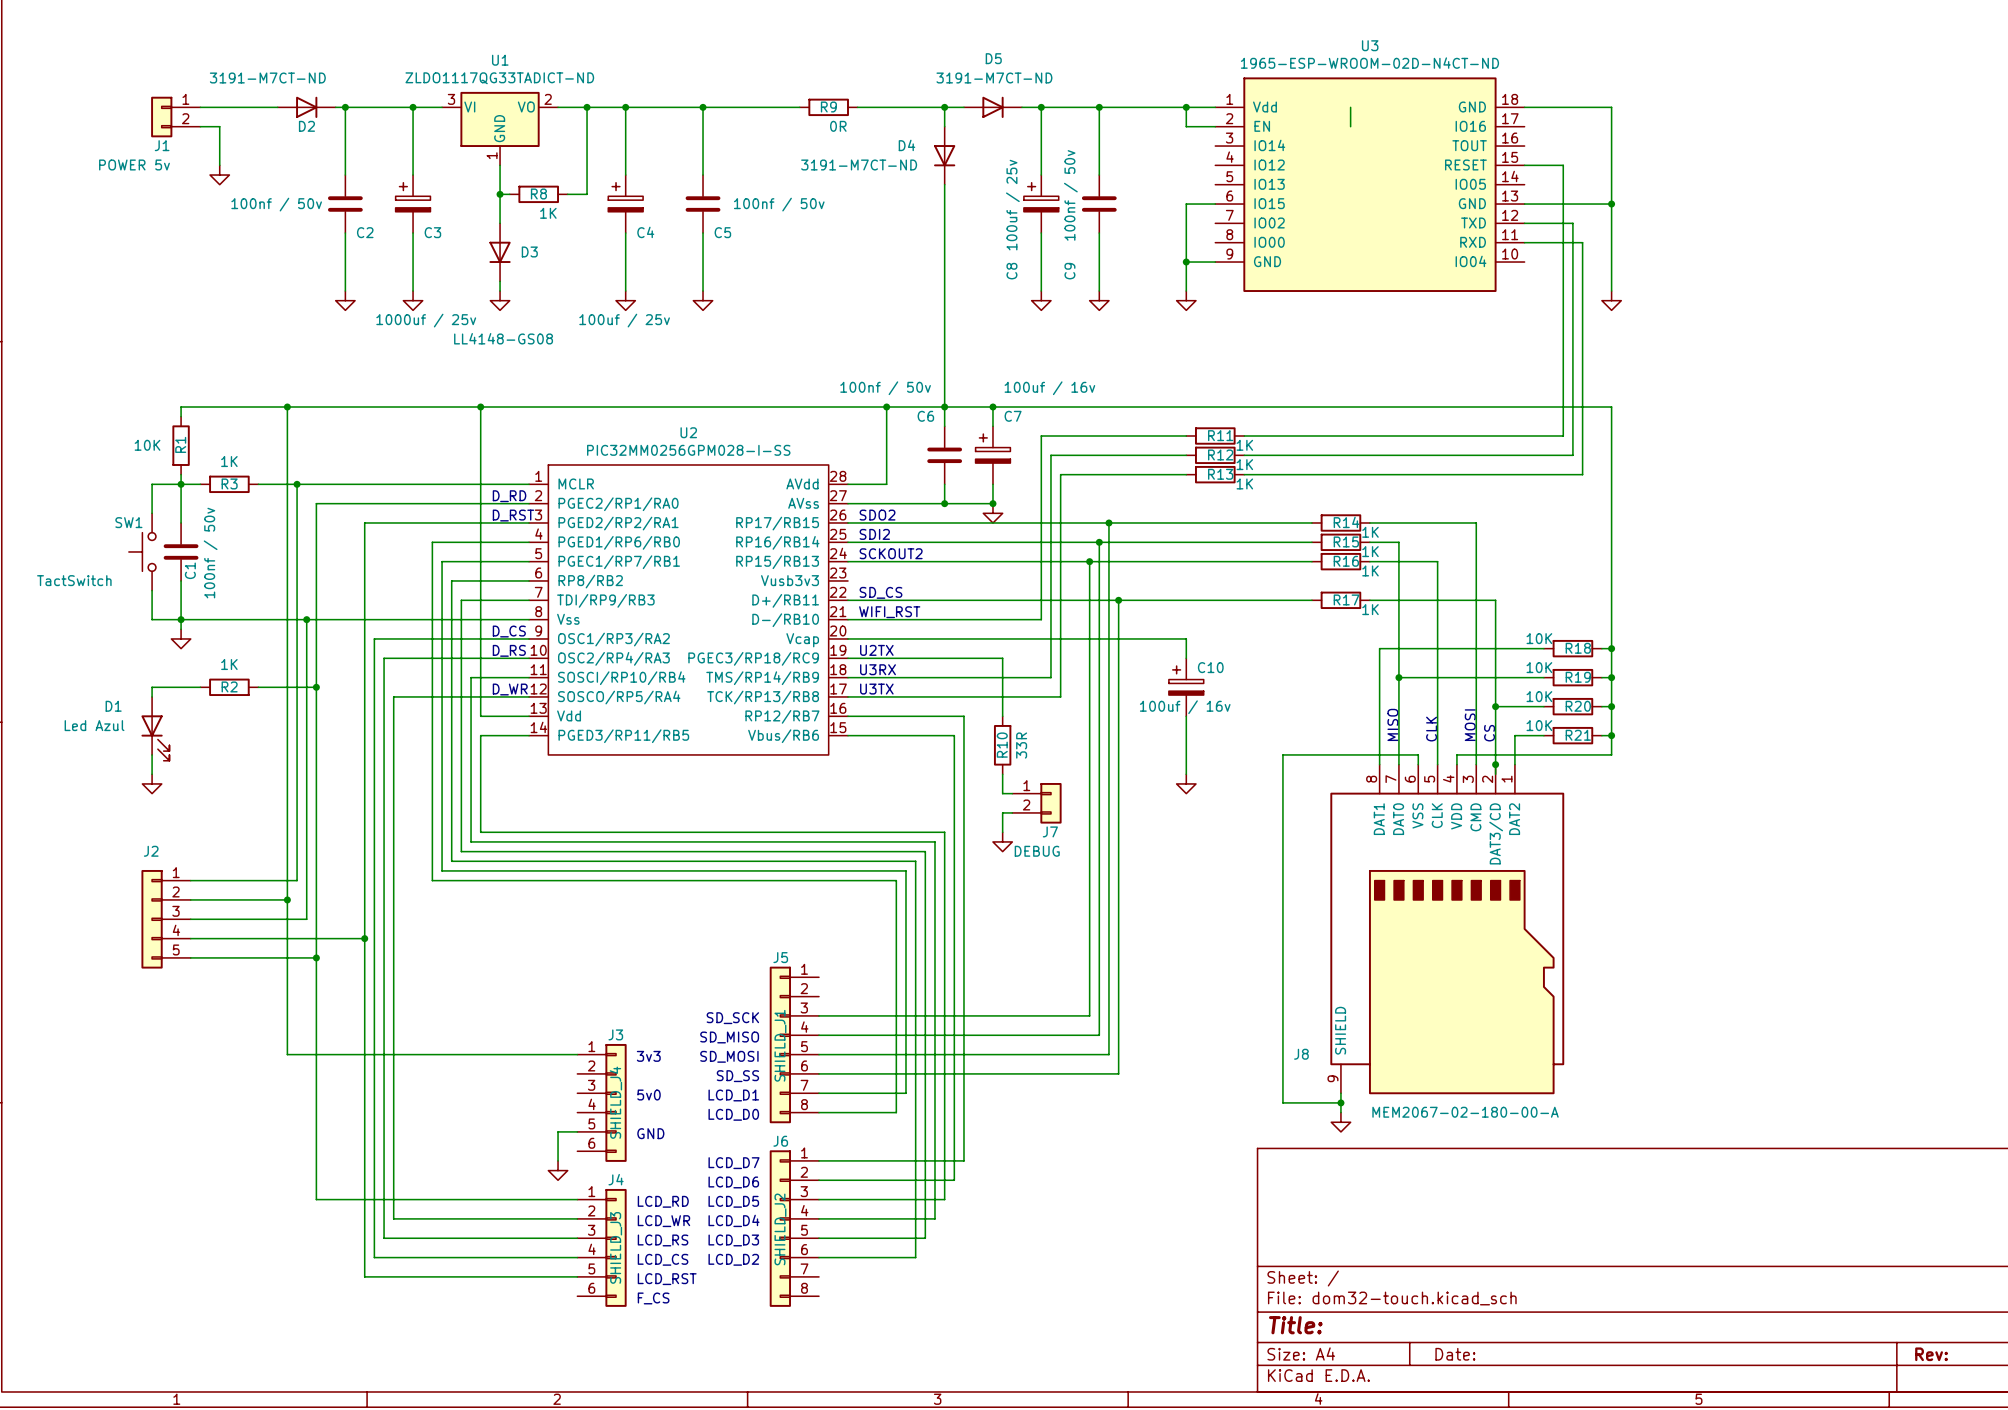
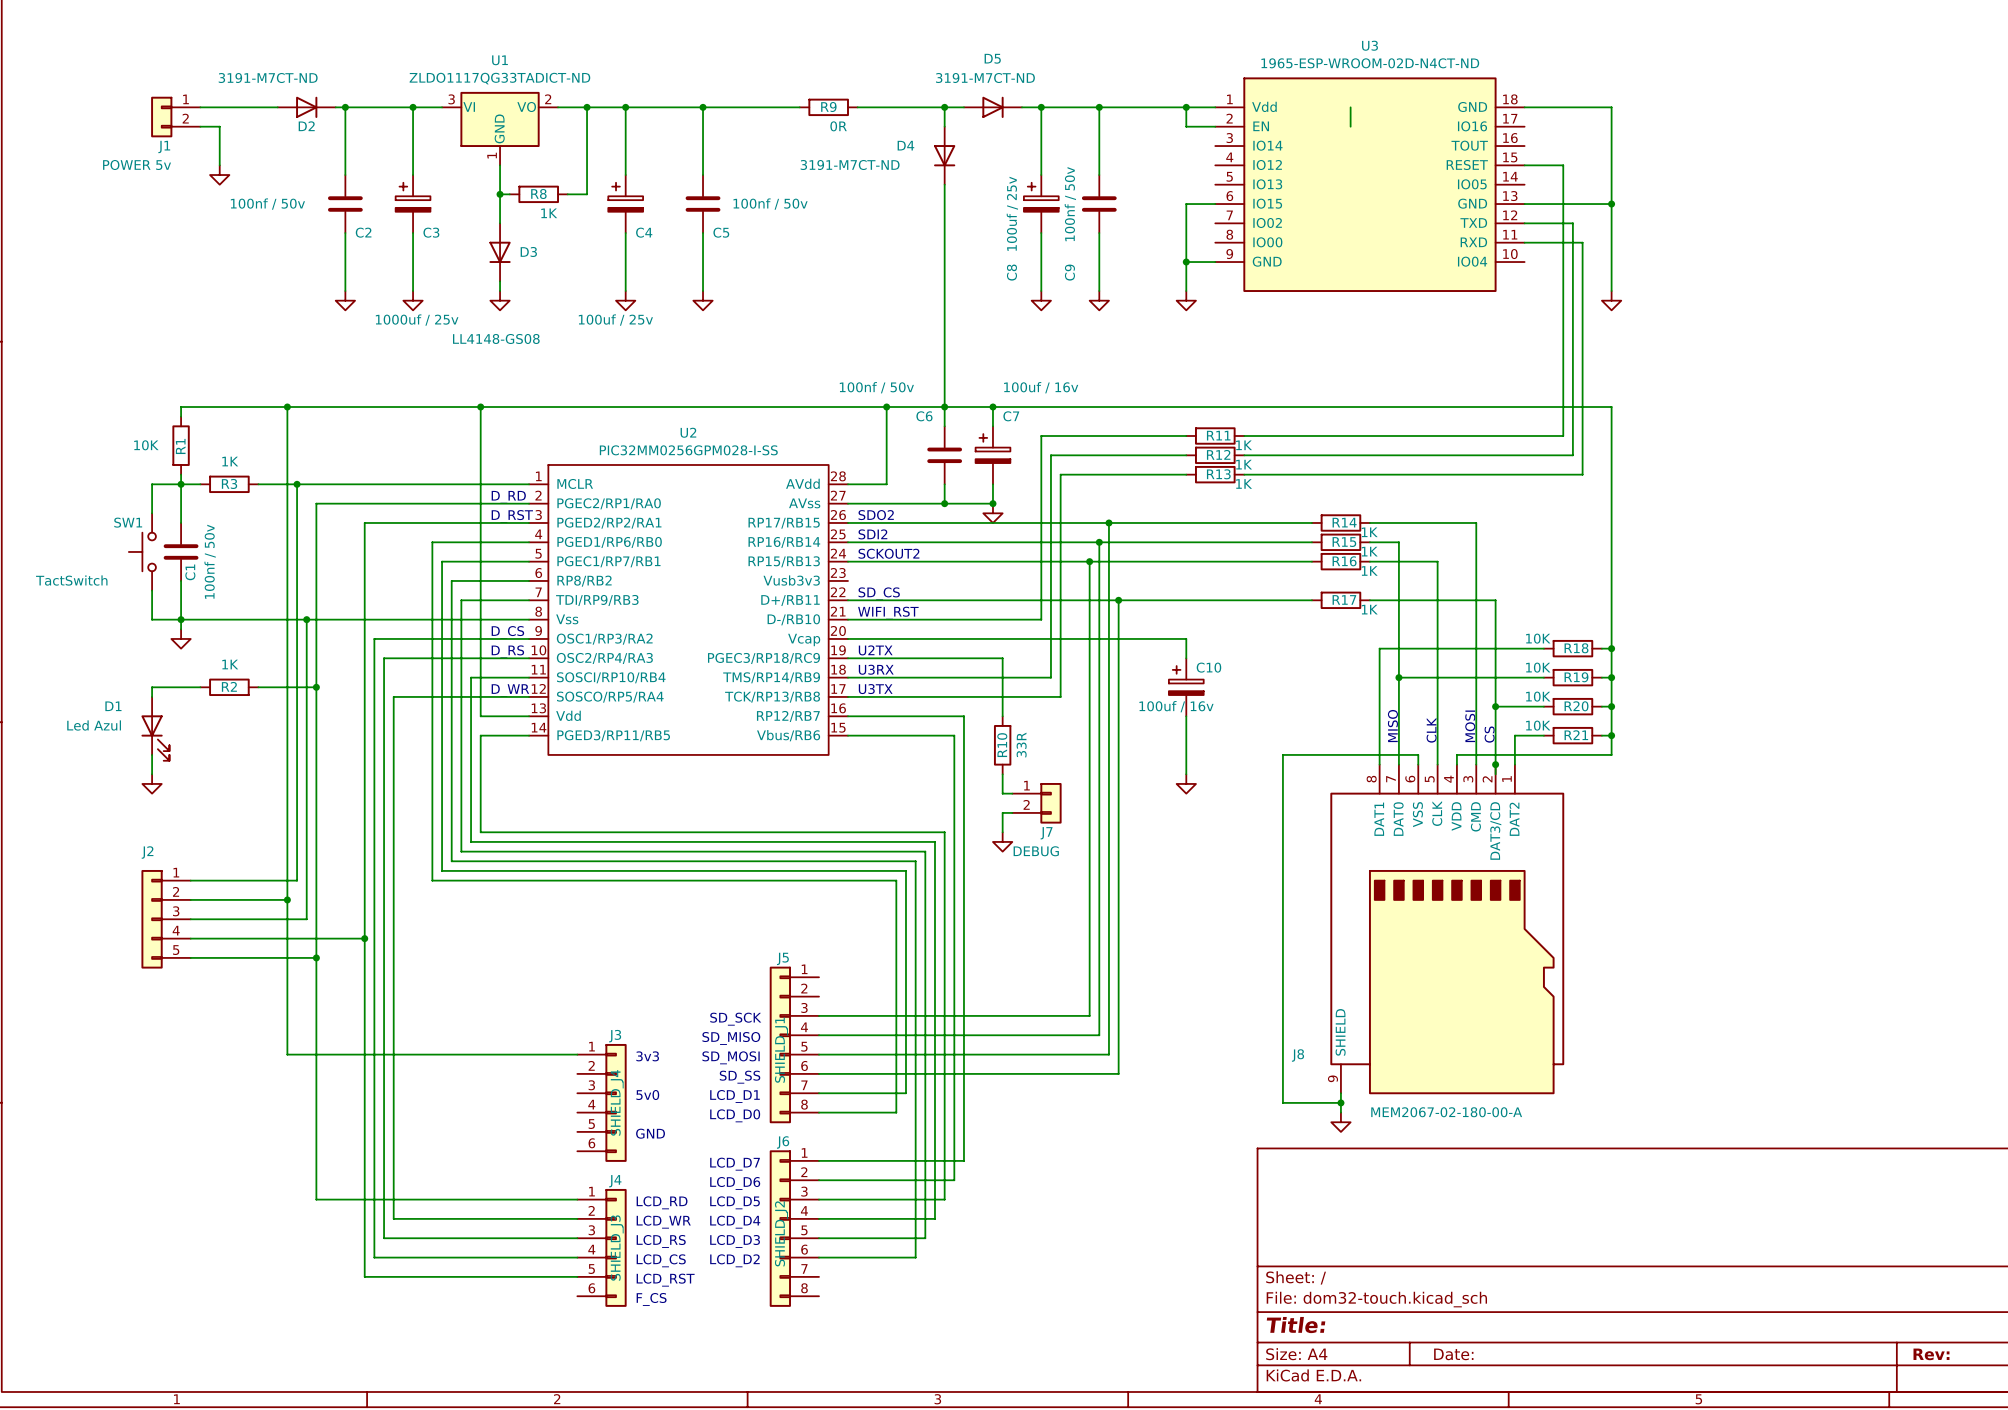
wire: (577, 1131) (558, 1131) (558, 1160) -> none
power symbol: (558, 1170) -> none

